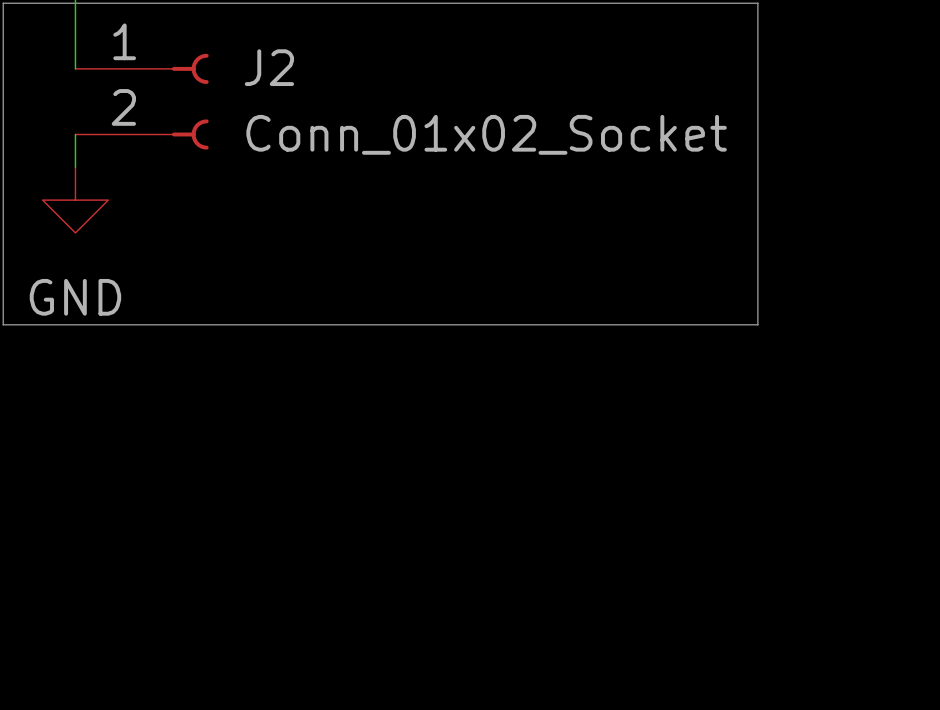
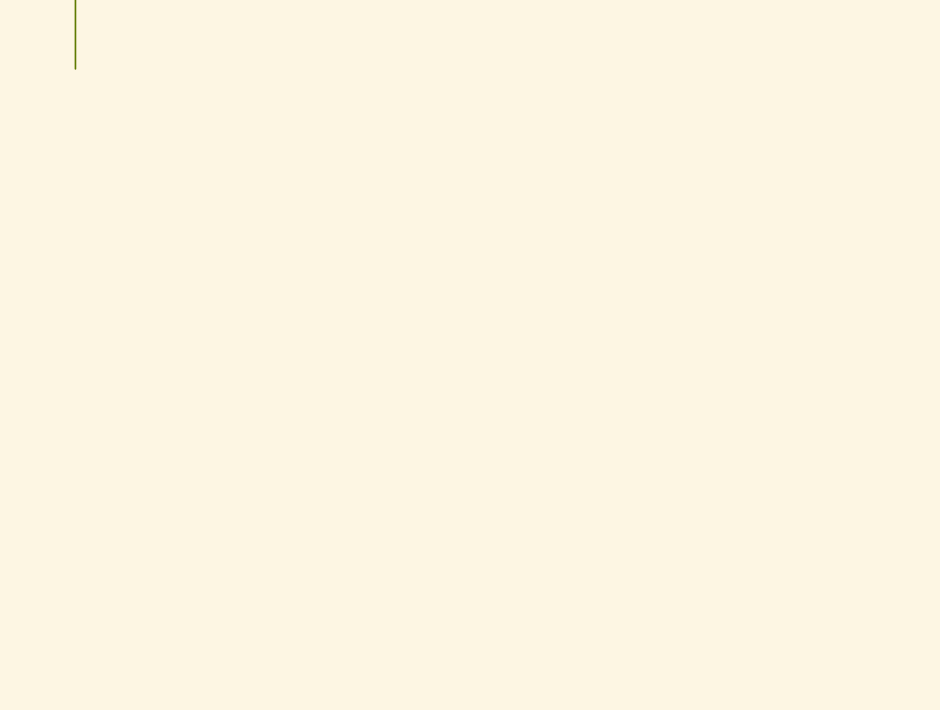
line: (3, 3) (757, 3) (757, 324) (3, 324) (3, 3) -> none
J2: Conn_01x02_Socket (142, 101) -> none
wire: (75, 134) (75, 167) -> none
power symbol: GND (75, 200) -> none

